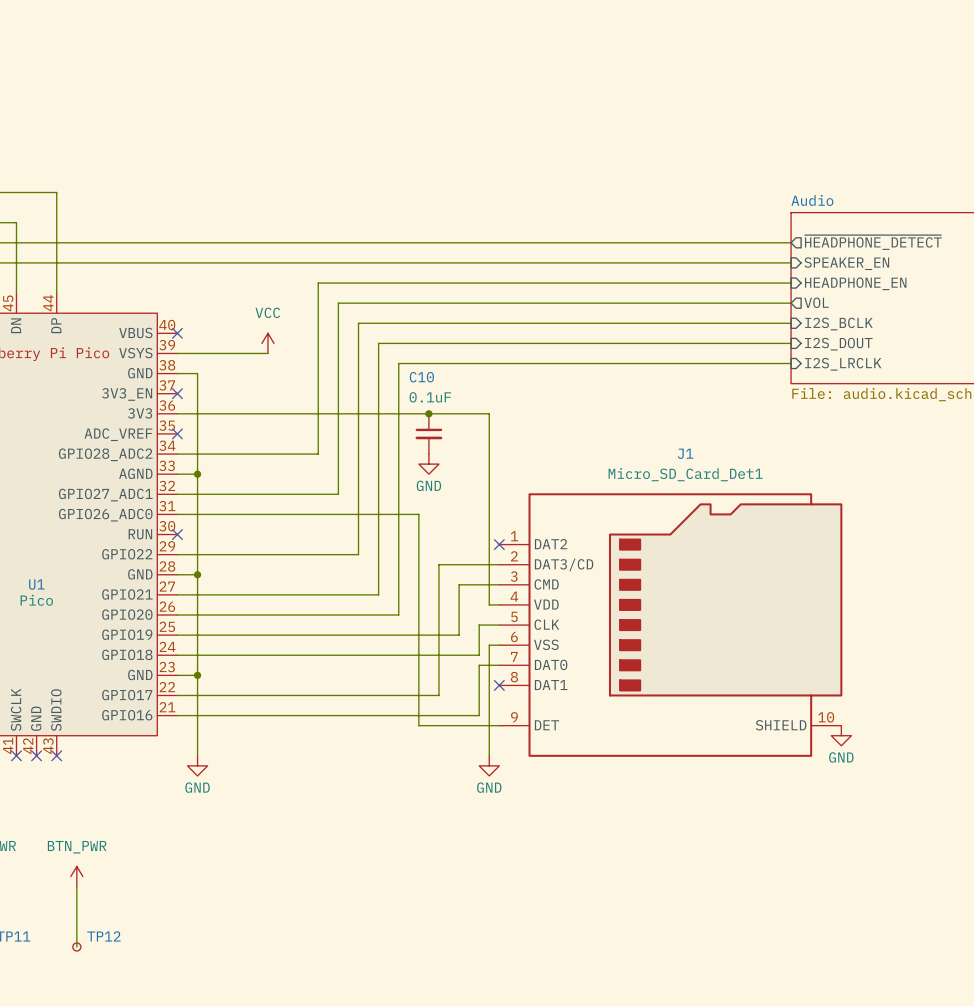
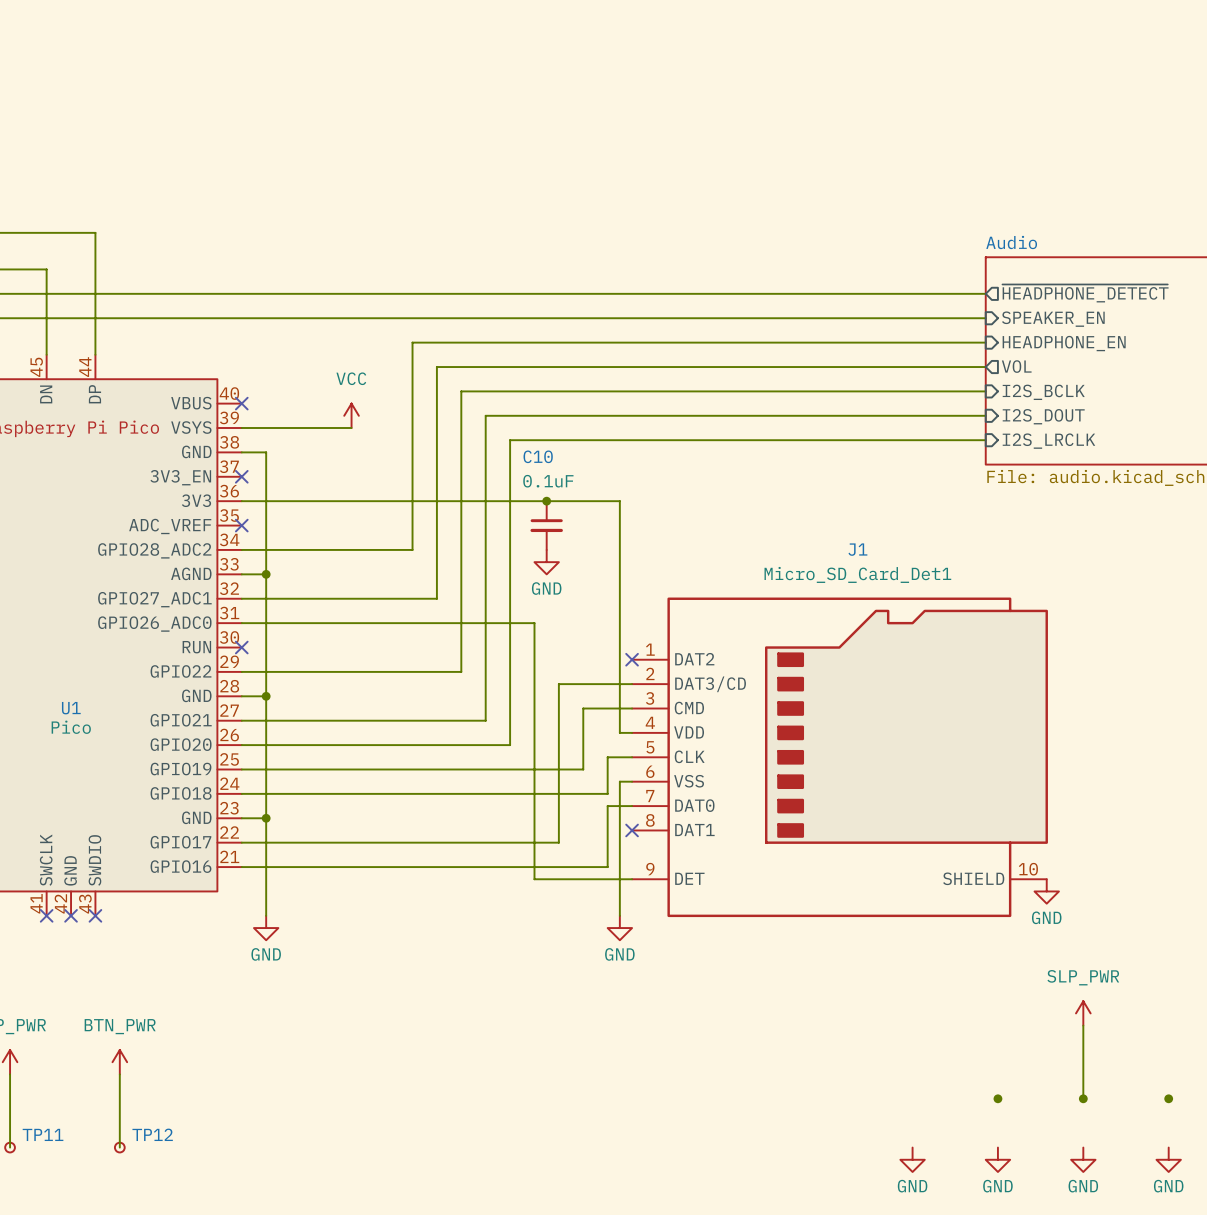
power symbol: none -> SLP_PWR (1083, 1013)
wire: none -> (1083, 1025) (1083, 1098)
junction: none -> (997, 1098)
junction: none -> (1083, 1098)
junction: none -> (1168, 1098)
power symbol: none -> GND (912, 1159)
power symbol: none -> GND (997, 1159)
power symbol: none -> GND (1083, 1159)
power symbol: none -> GND (1168, 1159)

